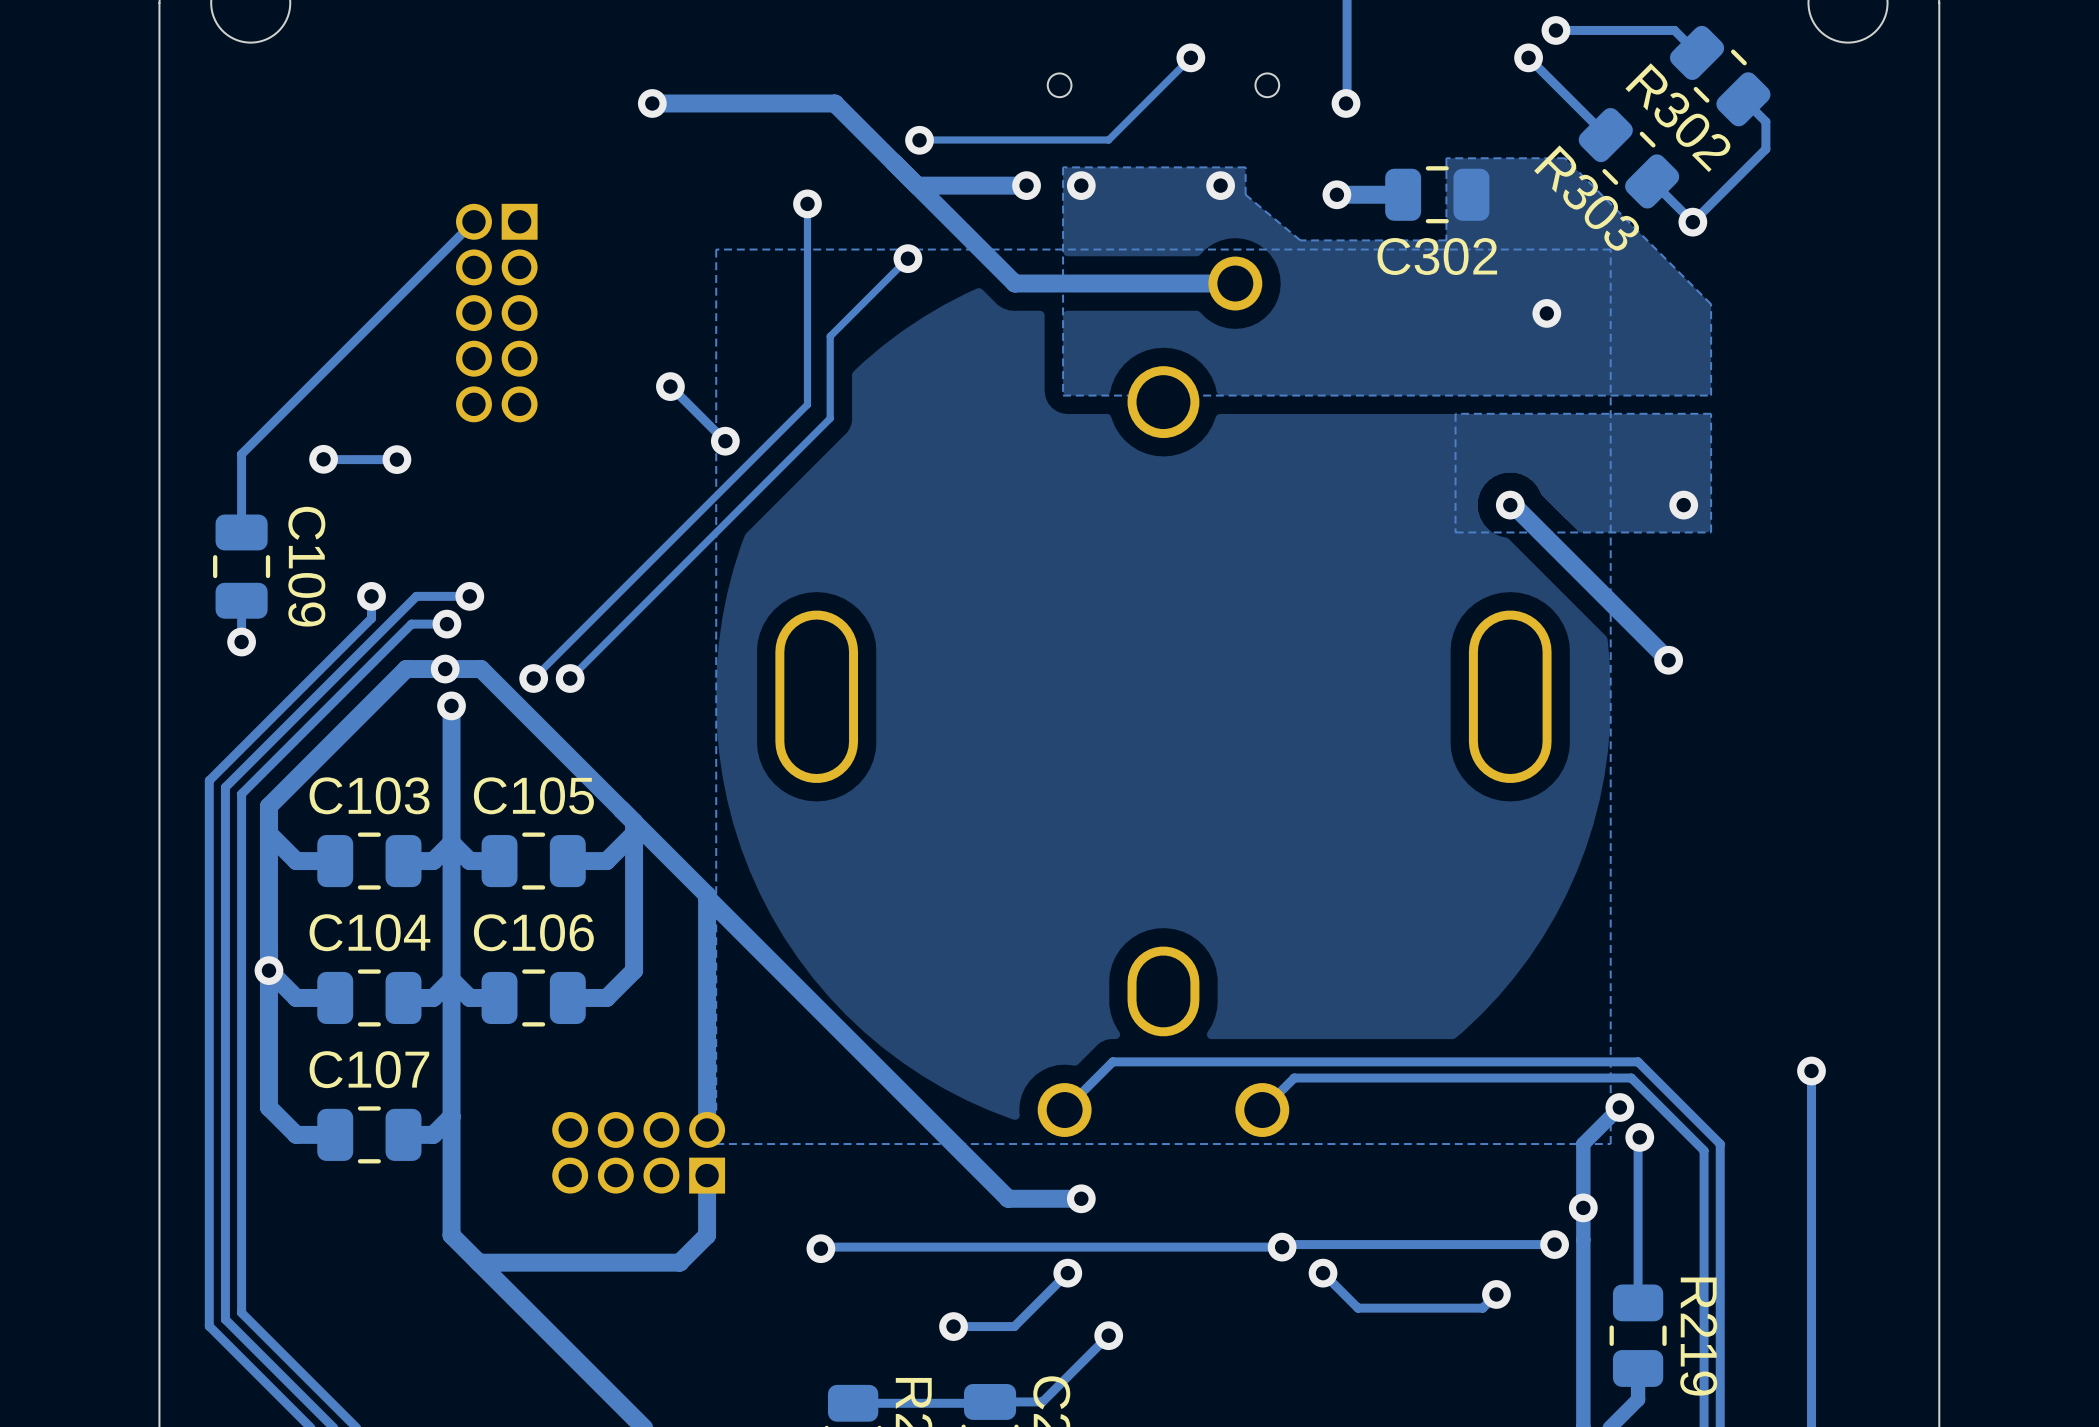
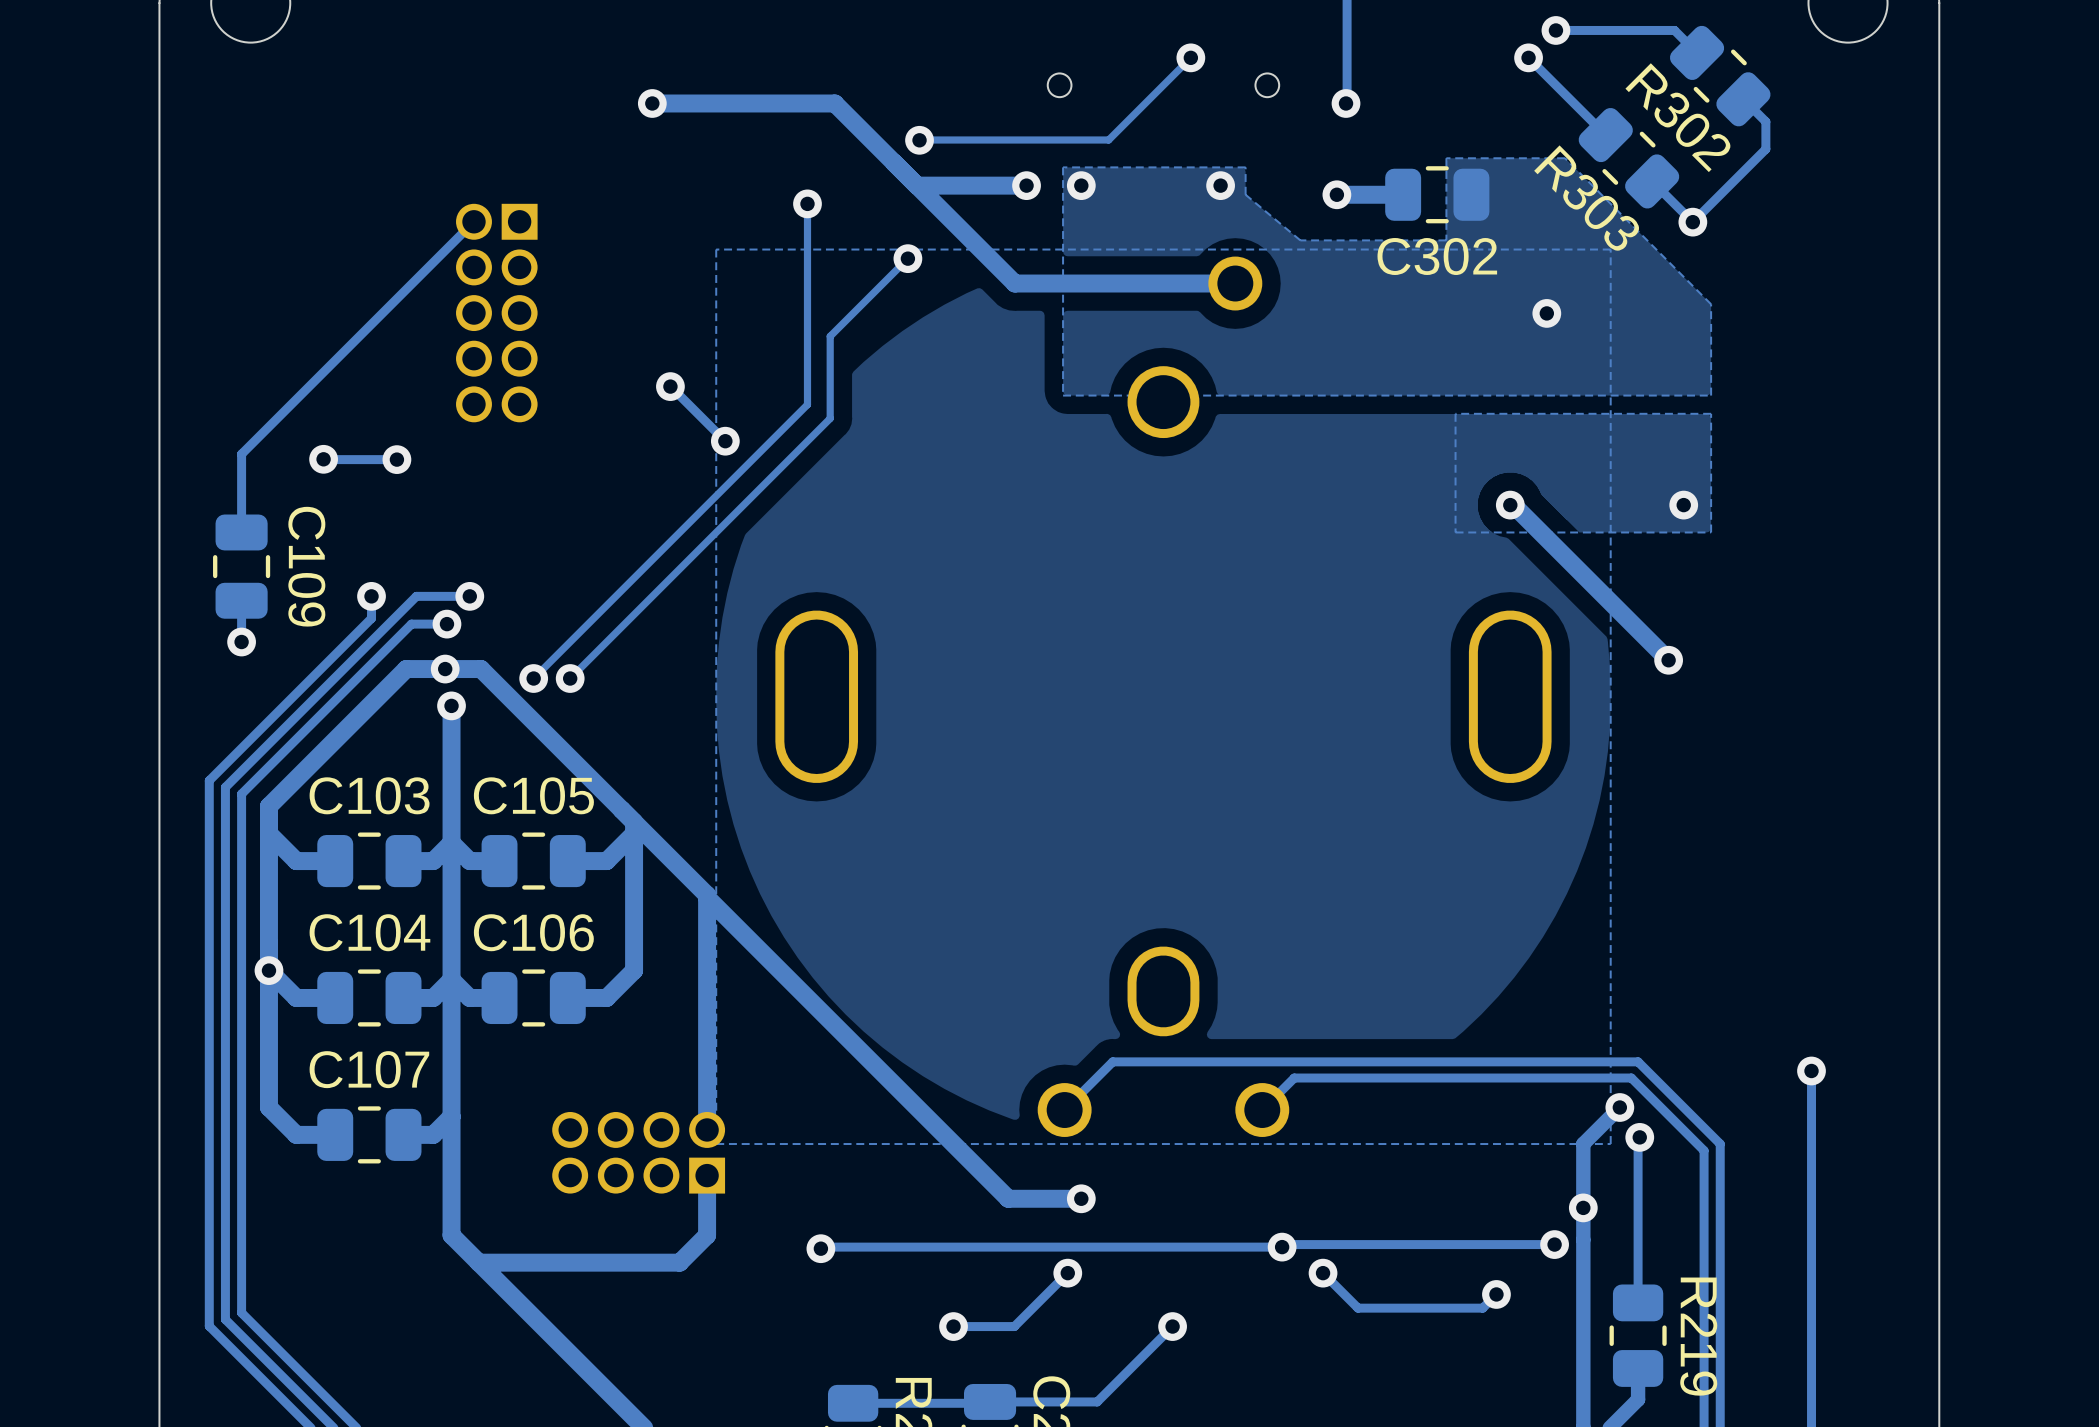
track: (1108, 1335) (1042, 1401) -> (1172, 1326) (1097, 1401) (1042, 1401)
via position: (1108, 1335) -> (1172, 1326)

